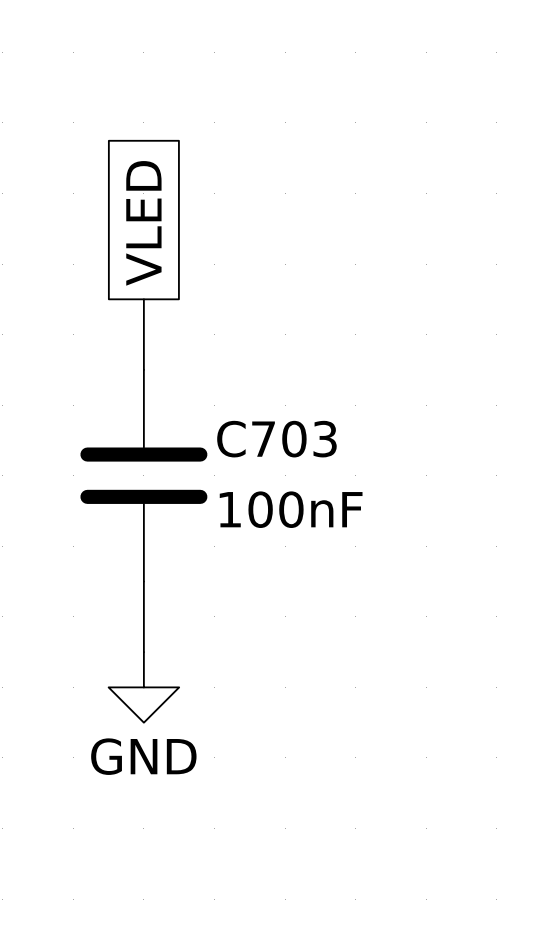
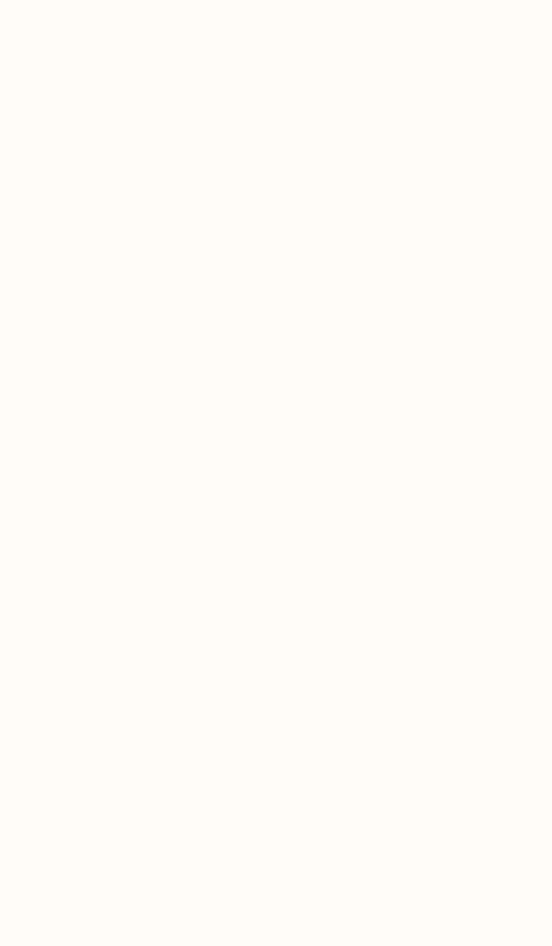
global label: VLED (143, 223) -> none
wire: (143, 299) (143, 369) -> none
C703: 100nF (143, 475) -> none
wire: (143, 581) (143, 652) -> none
power symbol: GND (143, 687) -> none

